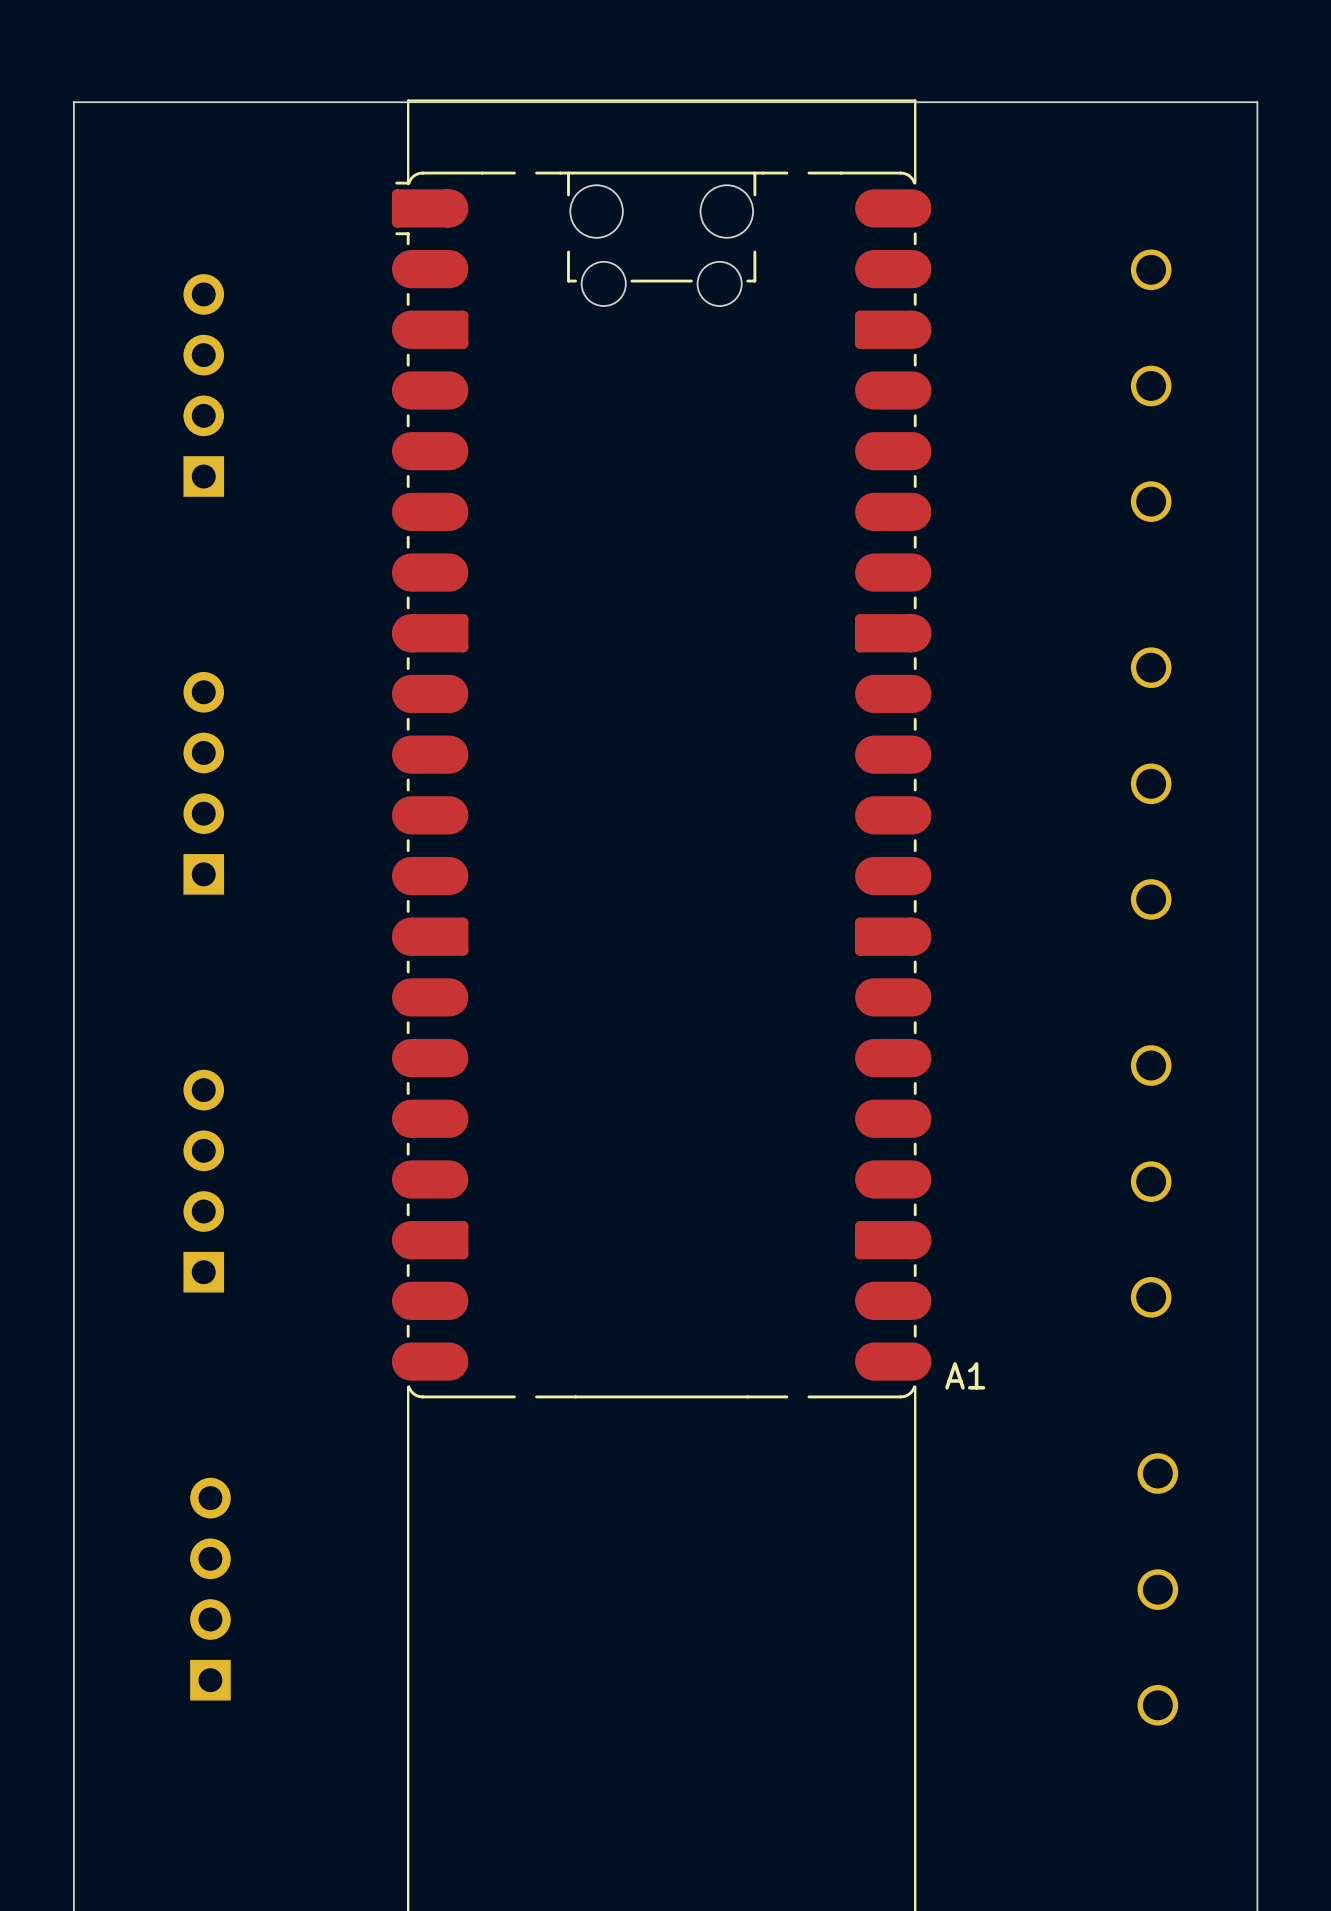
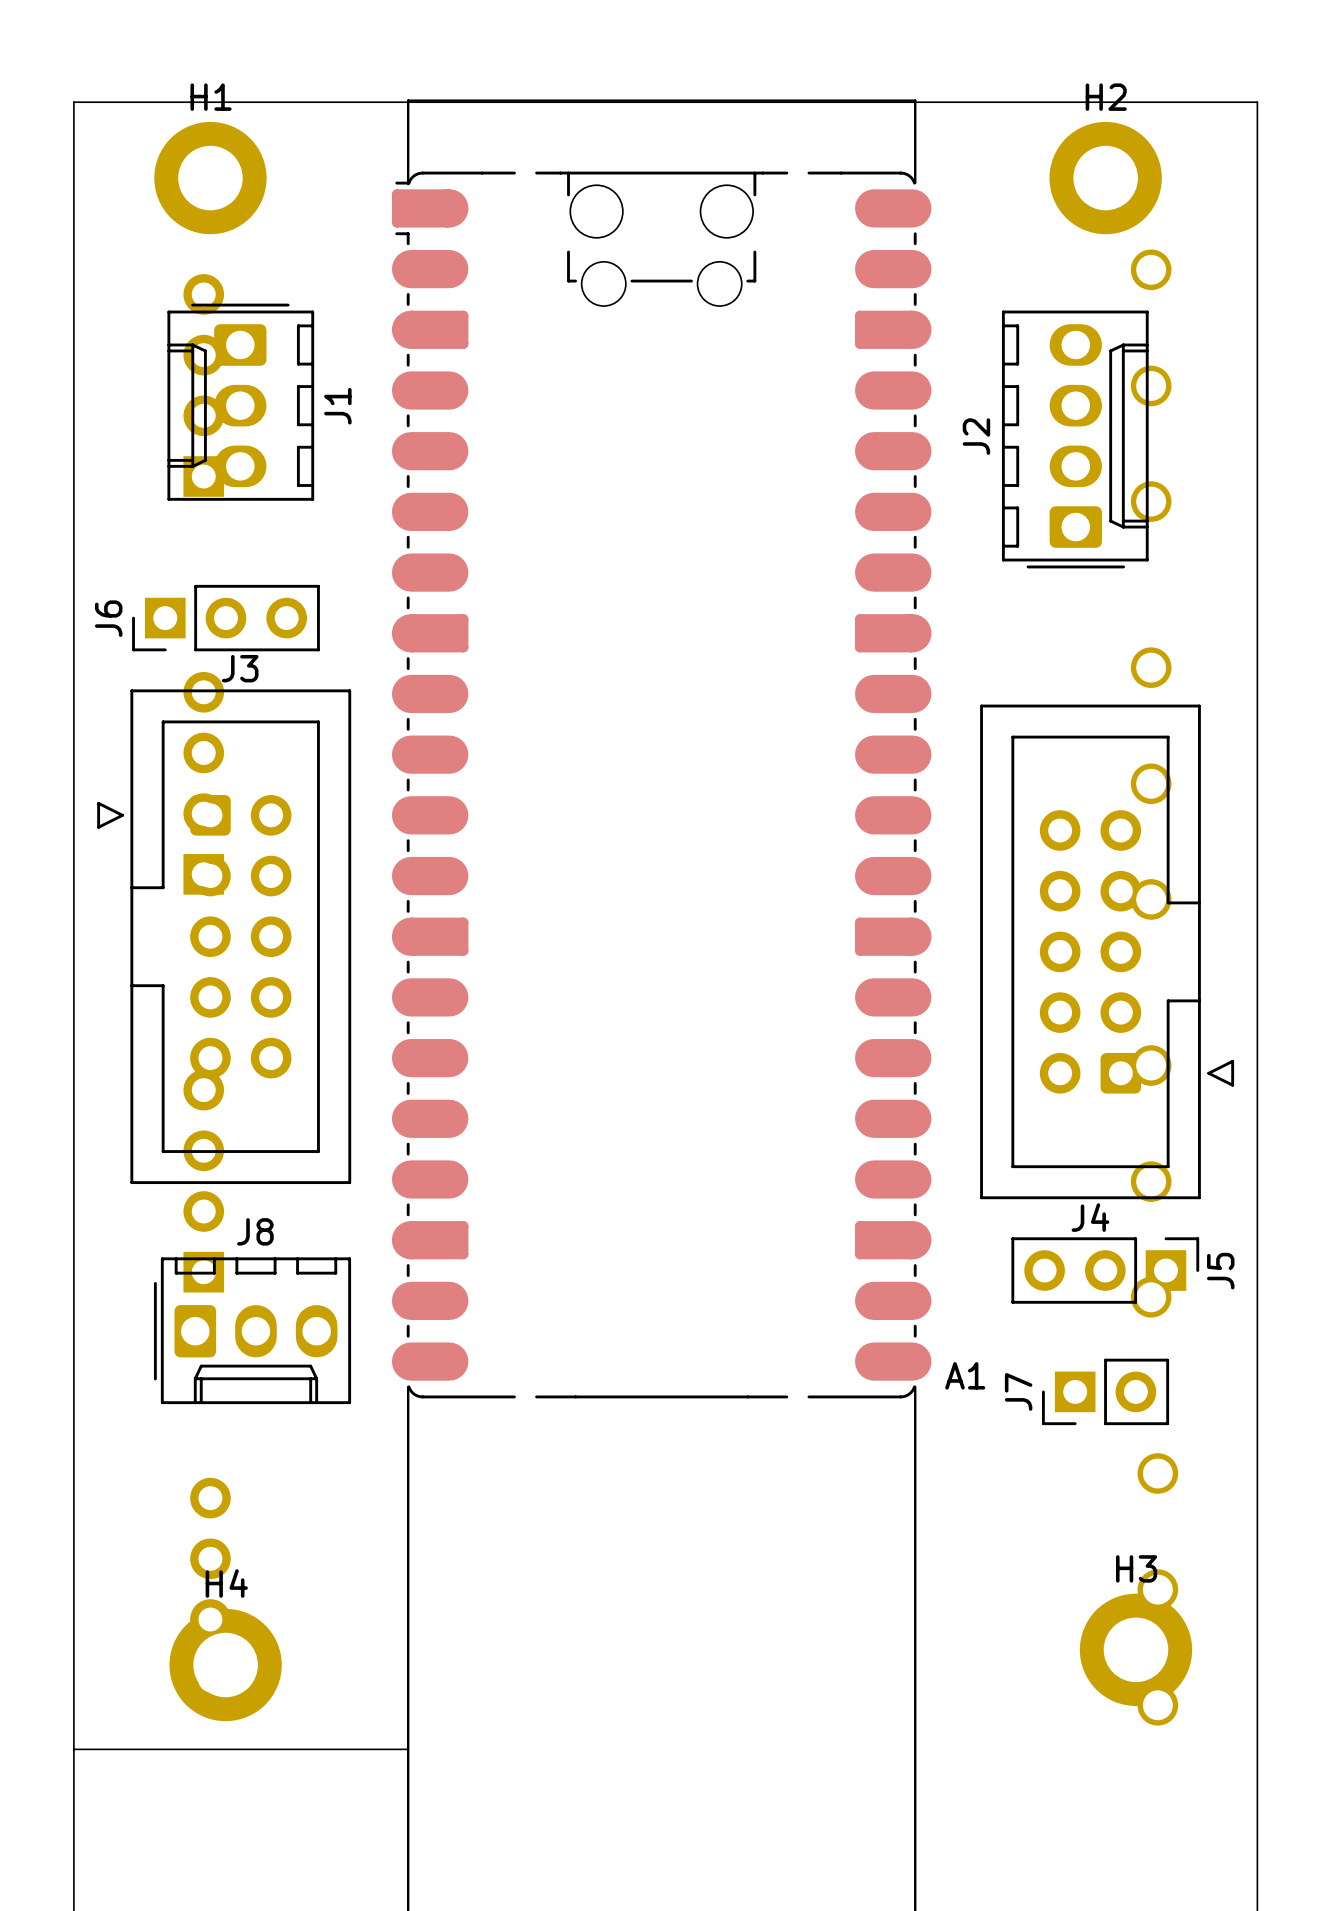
H1: none -> (210, 178)
H2: none -> (1105, 178)
J1: none -> (240, 402)
J2: none -> (1075, 439)
J6: none -> (225, 618)
J3: none -> (224, 936)
J4: none -> (1107, 951)
J5: none -> (1105, 1270)
J8: none -> (252, 1330)
J7: none -> (1105, 1391)
H3: none -> (1136, 1649)
H4: none -> (225, 1665)
board edge: none -> (73, 1749) (408, 1749)

